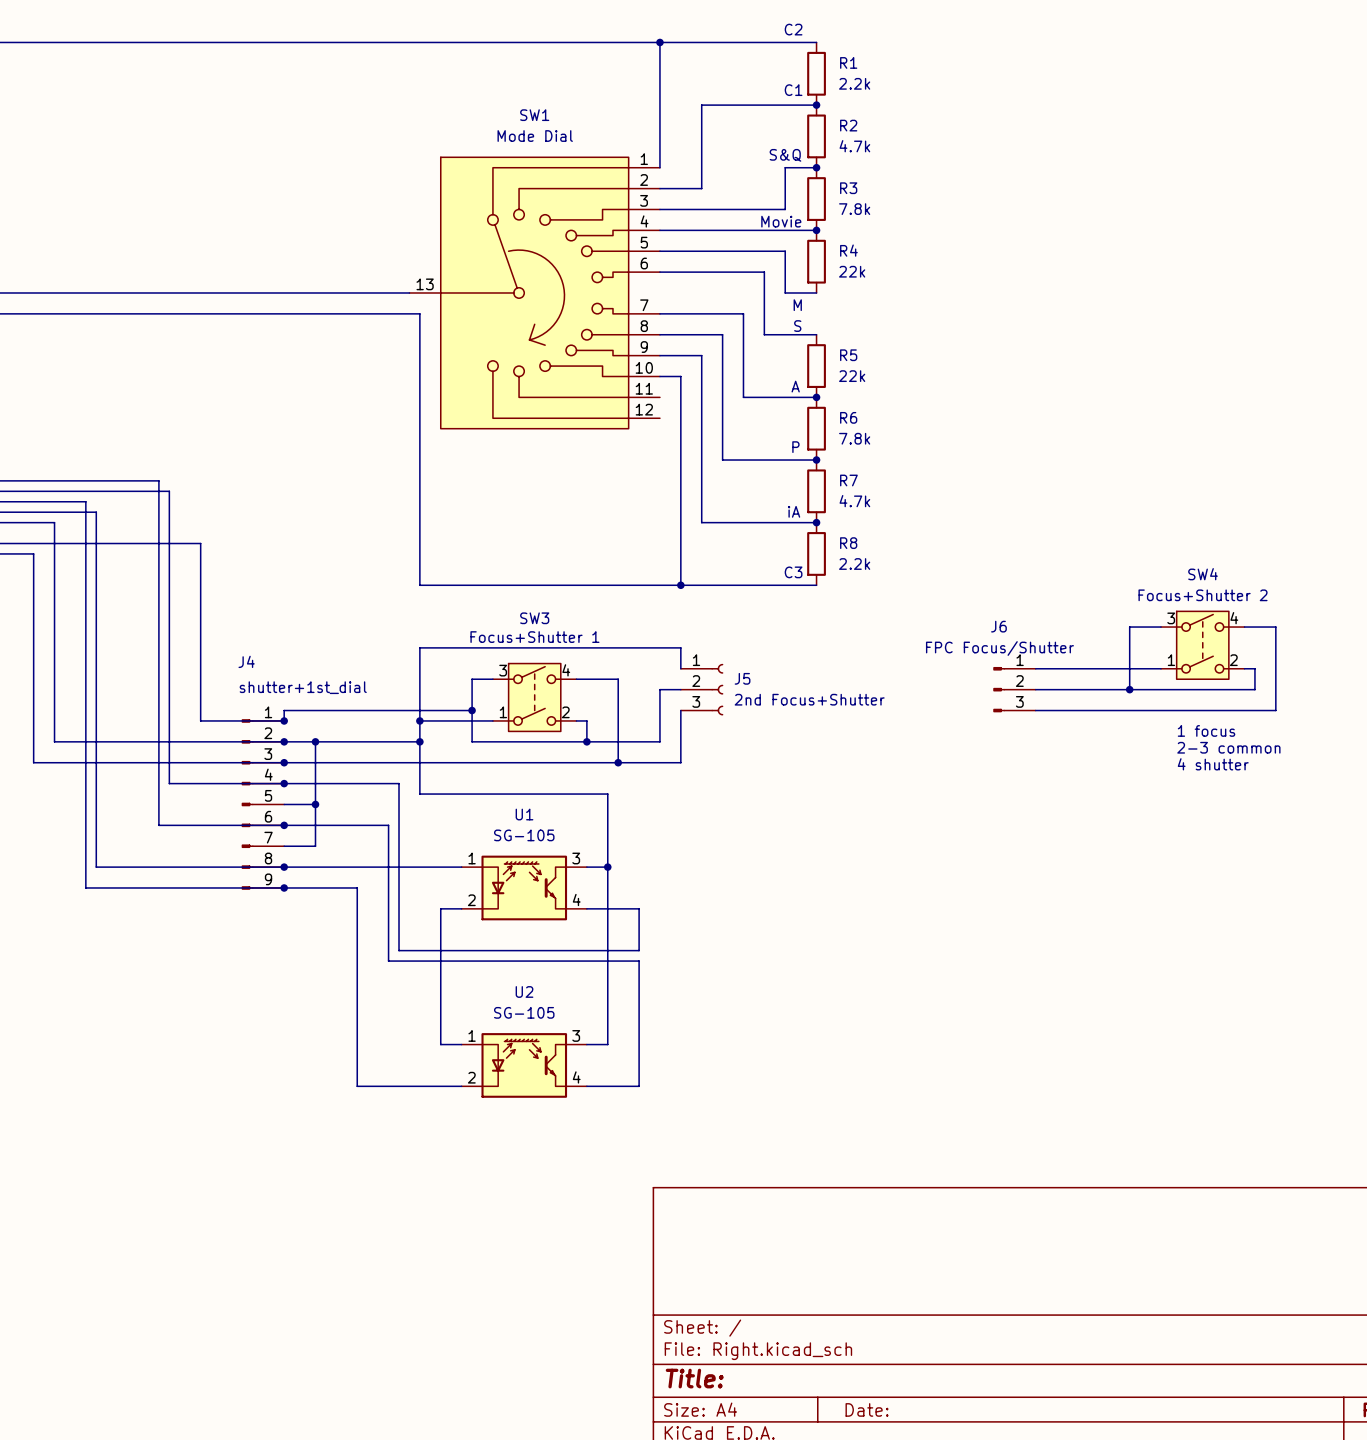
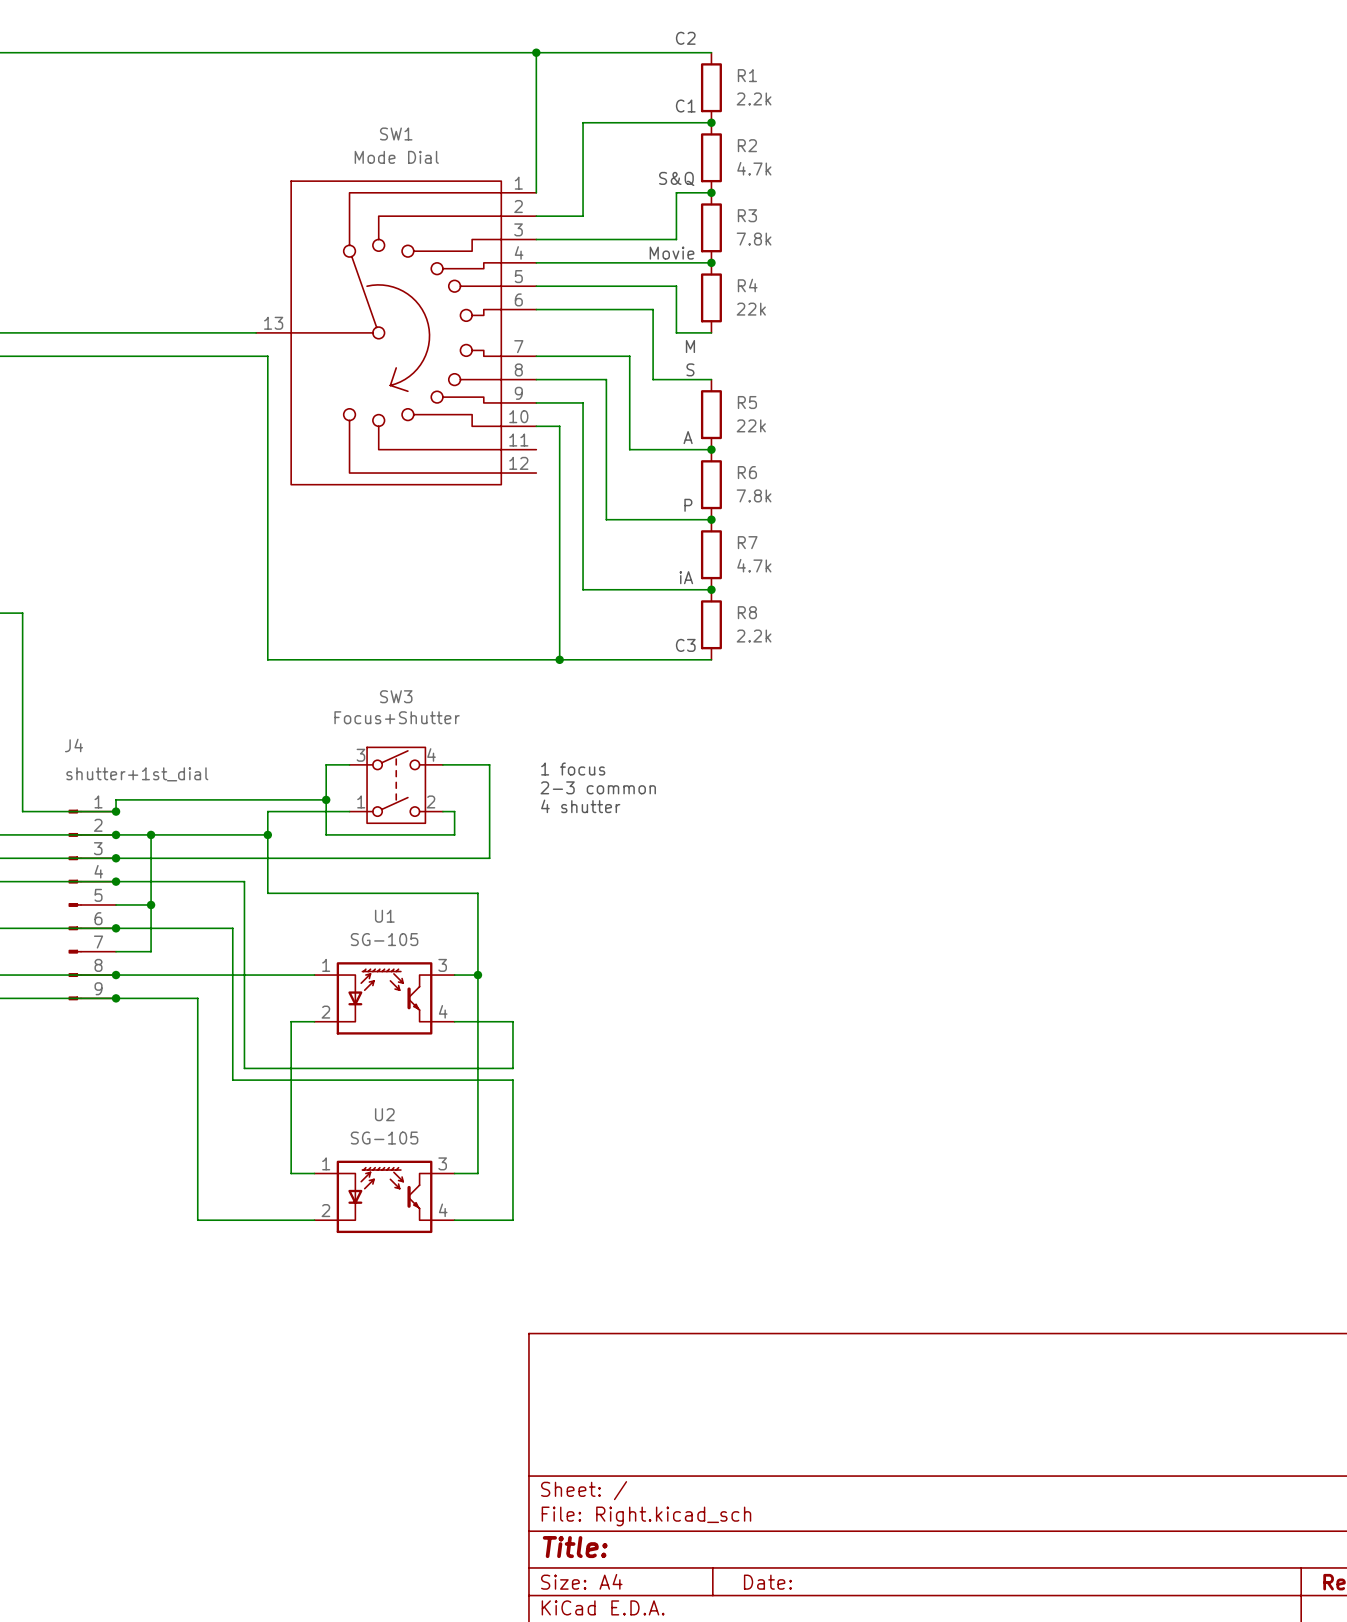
wire: (1161, 627) (1129, 627) (1129, 689) -> none
wire: (1244, 627) (1275, 627) (1275, 710) (1035, 710) -> none
SW3 value: Focus+Shutter 1 (534, 637) -> Focus+Shutter (397, 717)
SW4: Focus+Shutter 2 (1202, 645) -> none
wire: (680, 668) (680, 647) (419, 647) (419, 720) -> none
wire: (1035, 668) (1161, 668) -> none
wire: (1244, 668) (1254, 668) (1254, 689) (1035, 689) -> none
text: none -> 1 focus (573, 769)
wire: (680, 689) (659, 689) (659, 741) (586, 741) -> none
J5: 2nd Focus+Shutter (702, 689) -> none
J6: FPC Focus/Shutter (1014, 689) -> none
junction: (1129, 689) -> none
text: none -> 2-3 common (598, 787)
wire: (680, 710) (680, 762) (618, 762) -> none
text: none -> 4 shutter (580, 806)
junction: (419, 720) -> none
text: 1 focus (1206, 730) -> none
junction: (586, 741) -> none
text: 2-3 common (1228, 747) -> none
junction: (618, 762) -> none
text: 4 shutter (1213, 764) -> none

